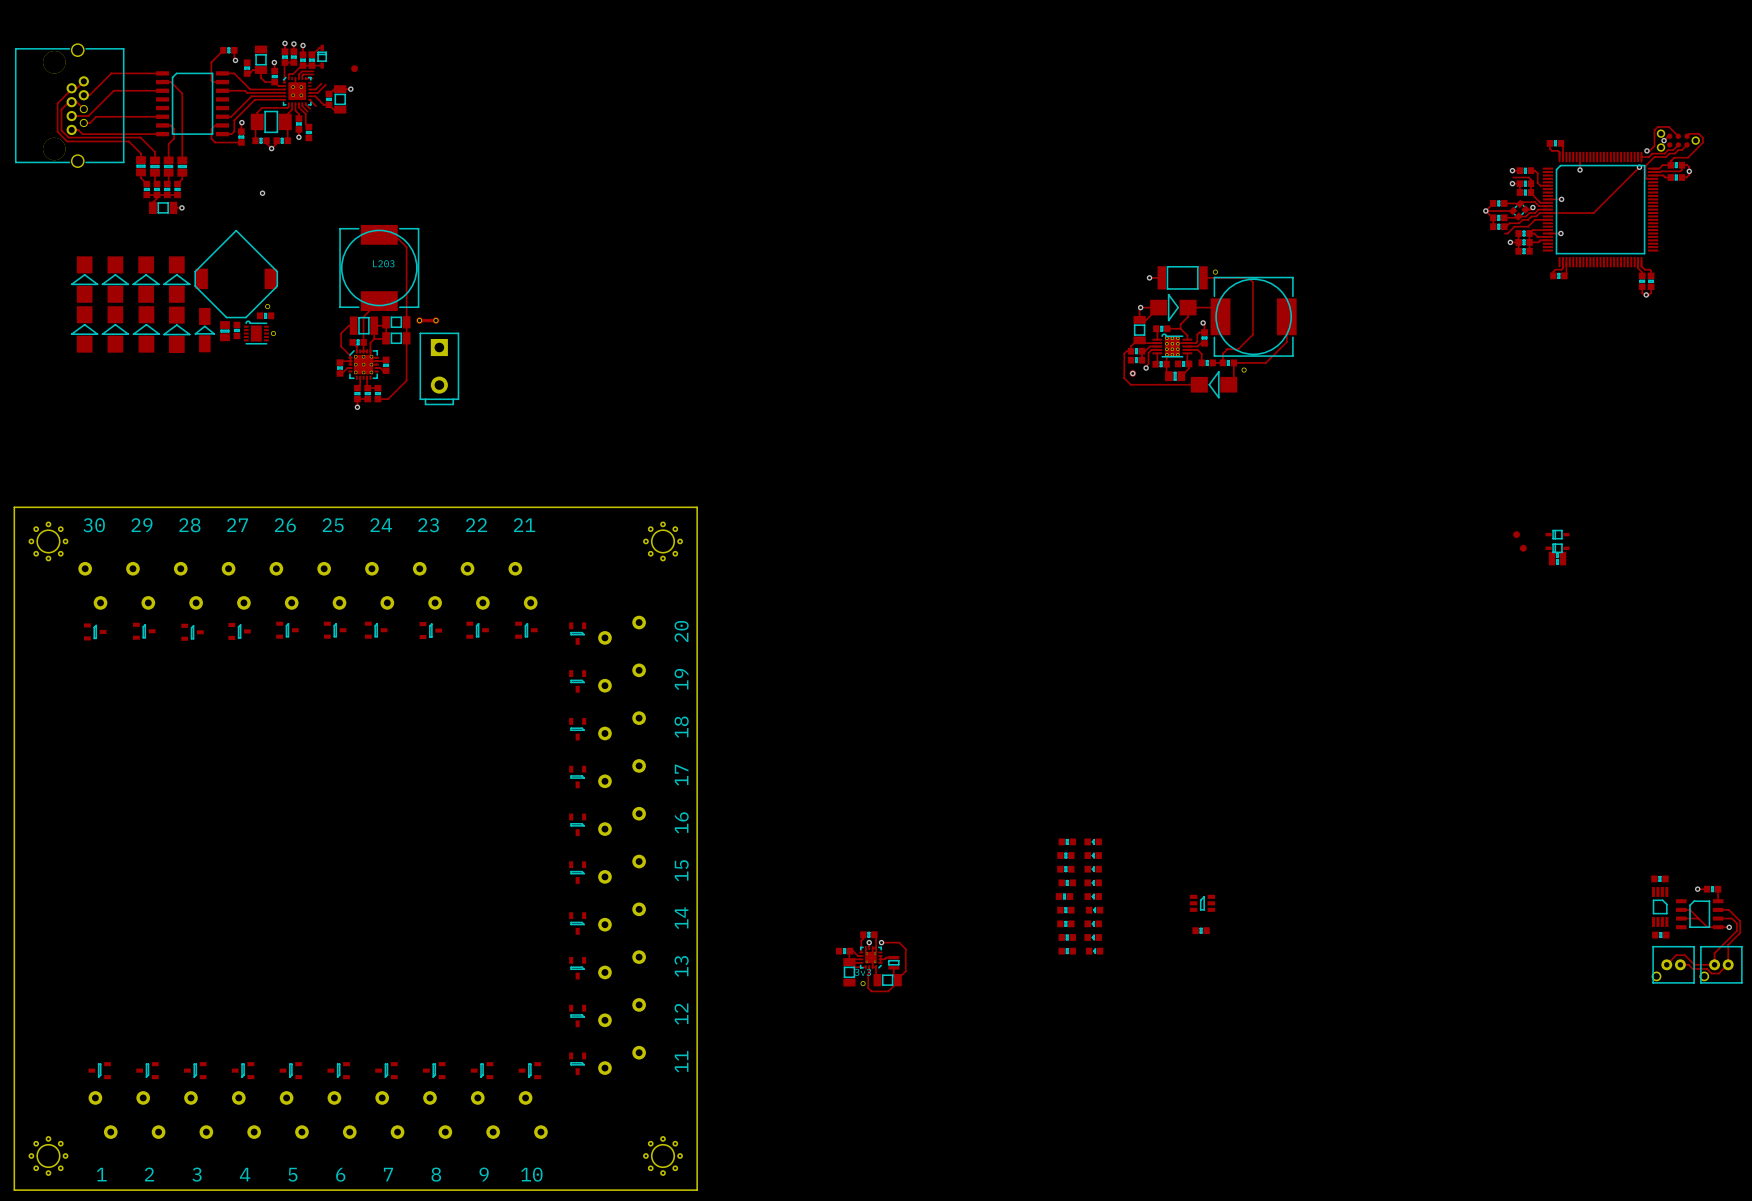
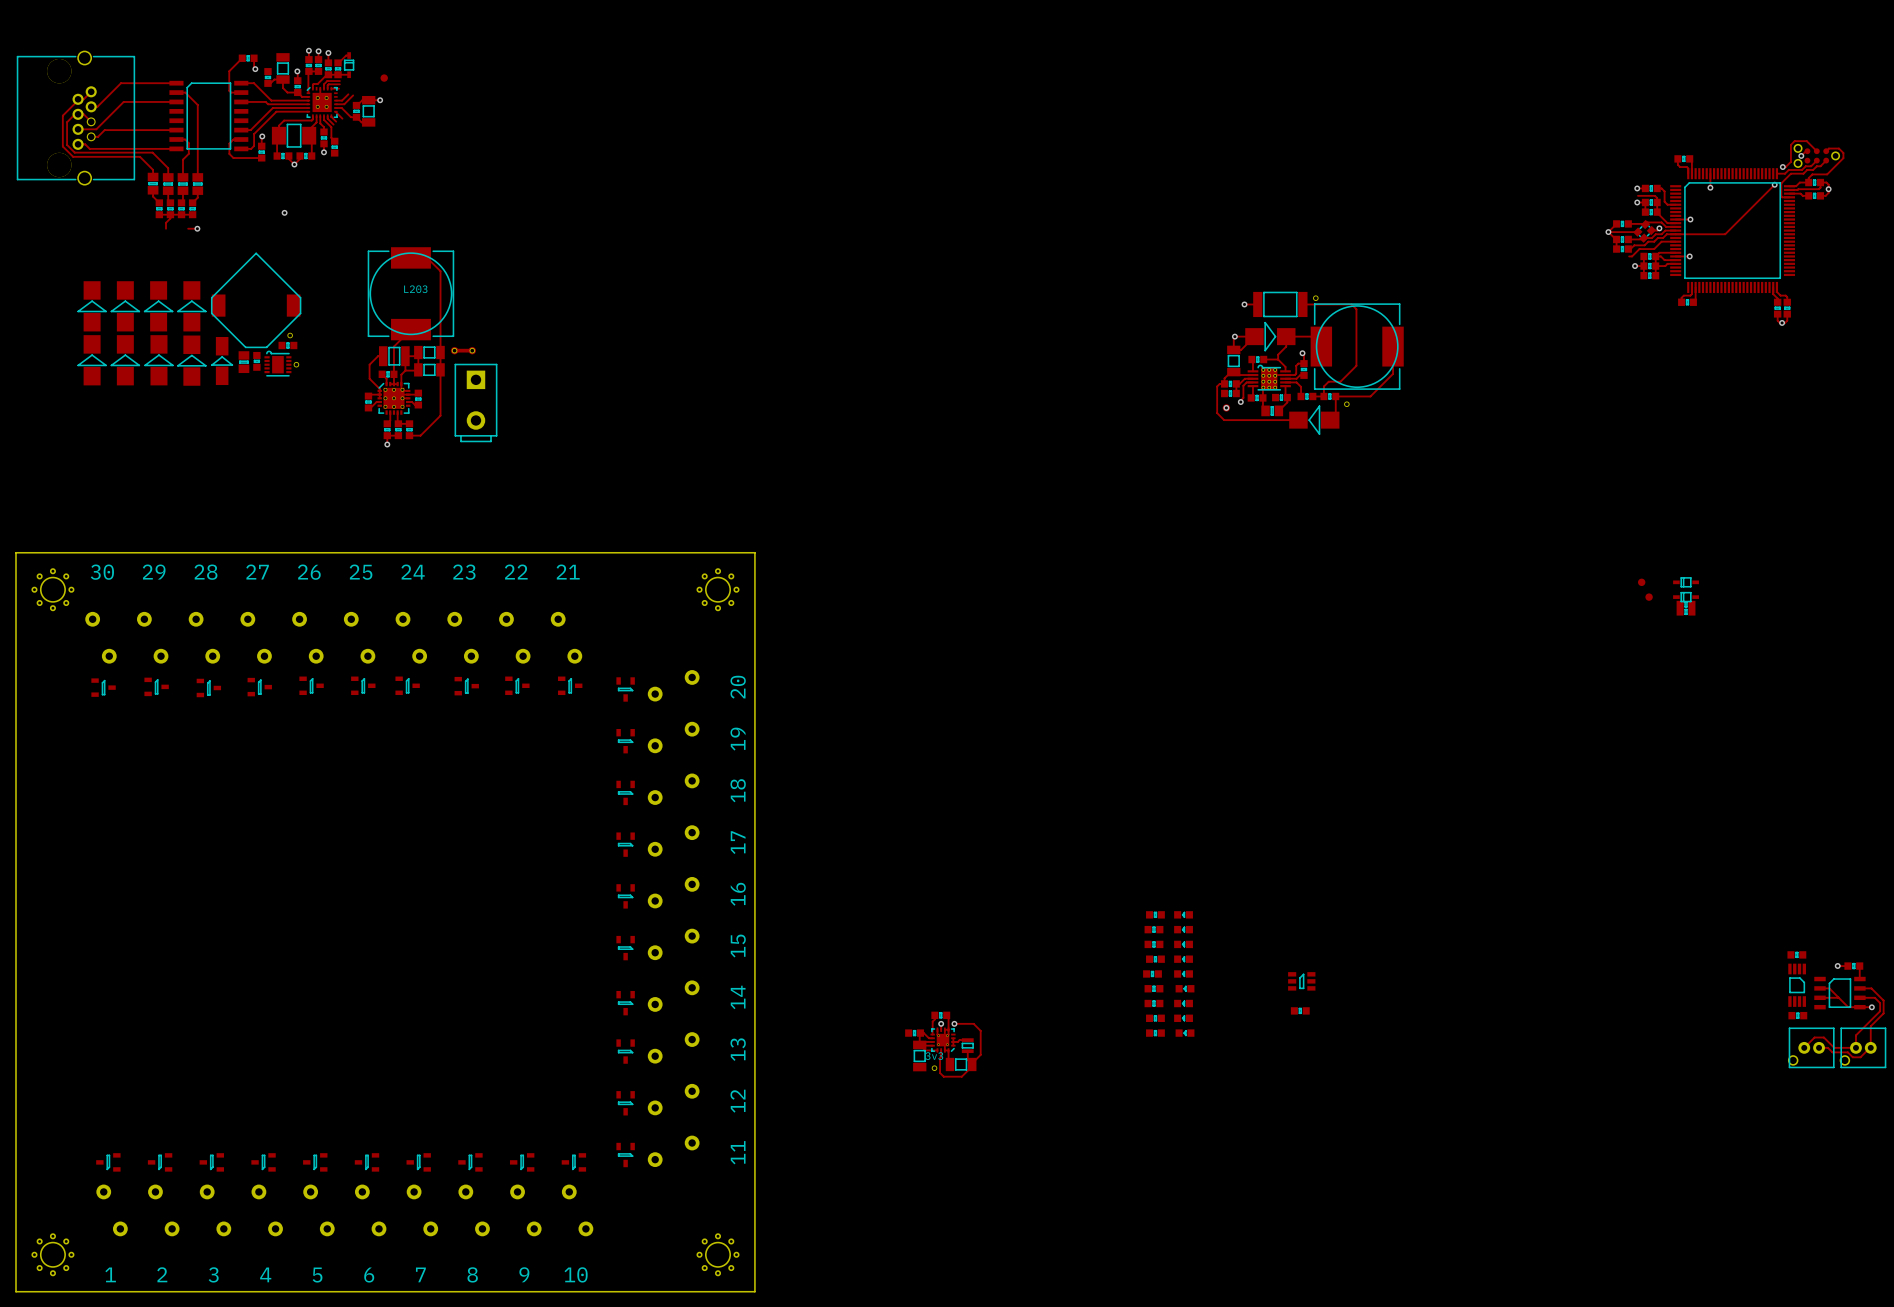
part: (163, 207) -> none

